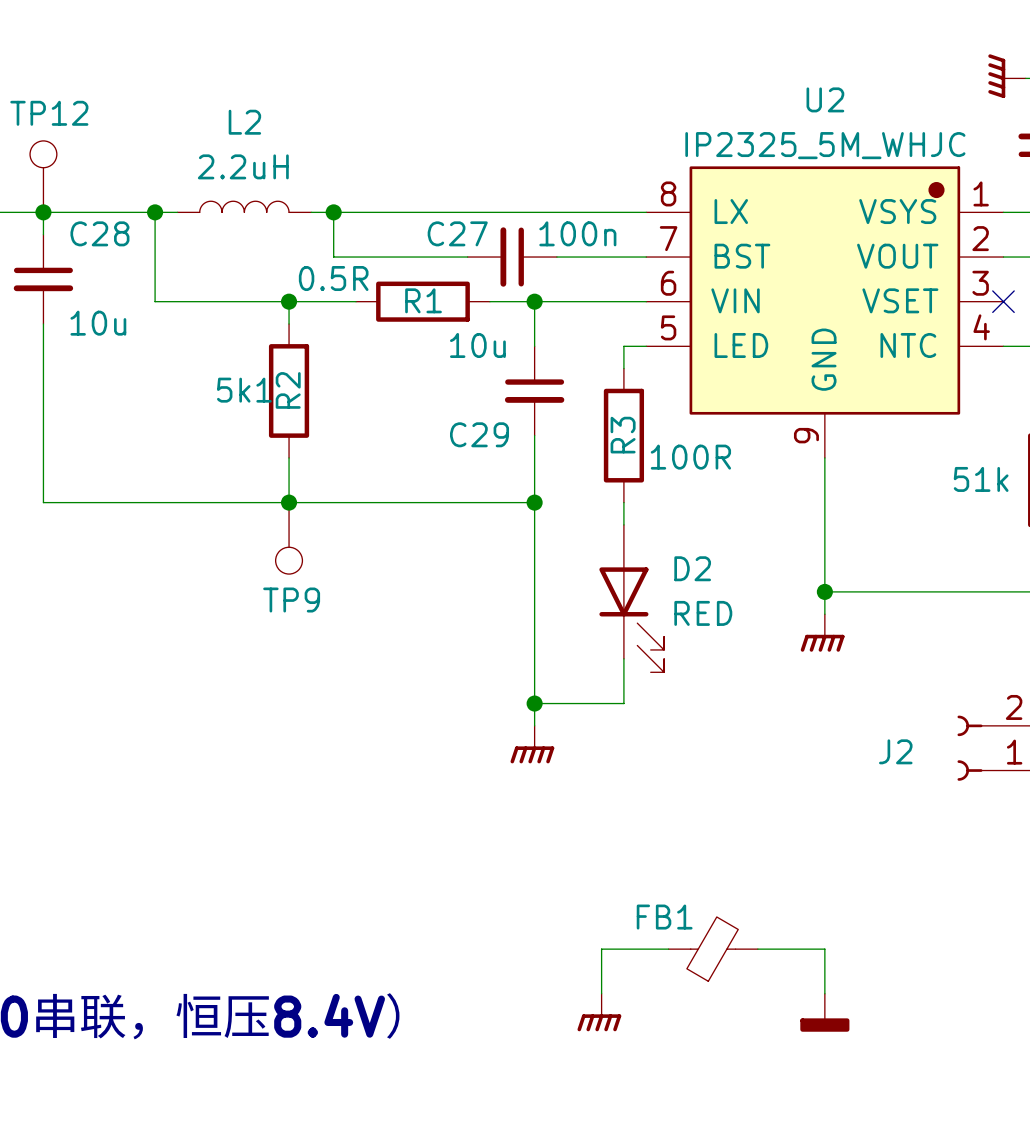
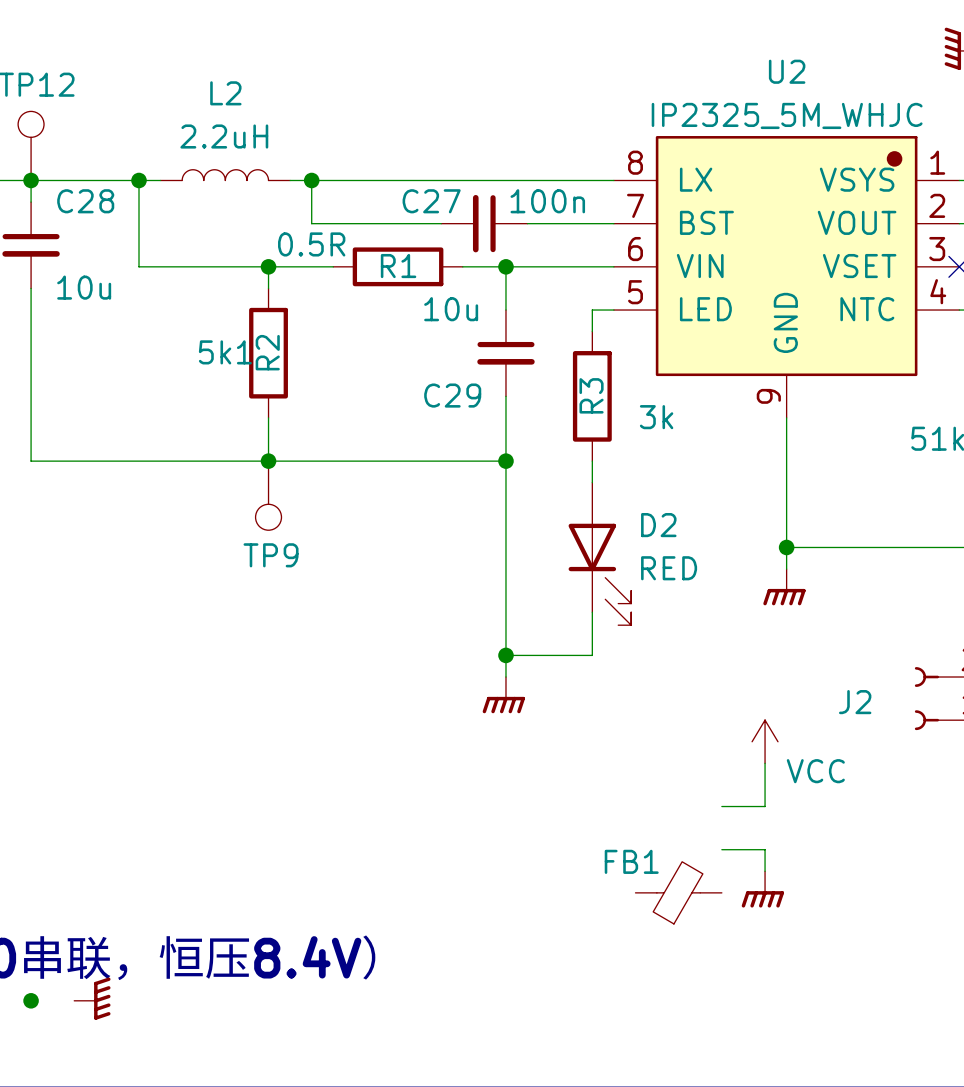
R3 value: 100R (690, 457) -> 3k (656, 417)
power symbol: none -> VCC (765, 741)
wire: none -> (765, 763) (765, 806) (721, 806)
wire: none -> (721, 849) (765, 849) (765, 871)
wire: (668, 949) (601, 949) (601, 993) -> none
wire: (757, 949) (824, 949) (824, 993) -> none
power symbol position: (599, 1012) -> (762, 889)
power symbol: (824, 1012) -> none
power symbol: none -> (92, 998)
junction: none -> (31, 1000)

